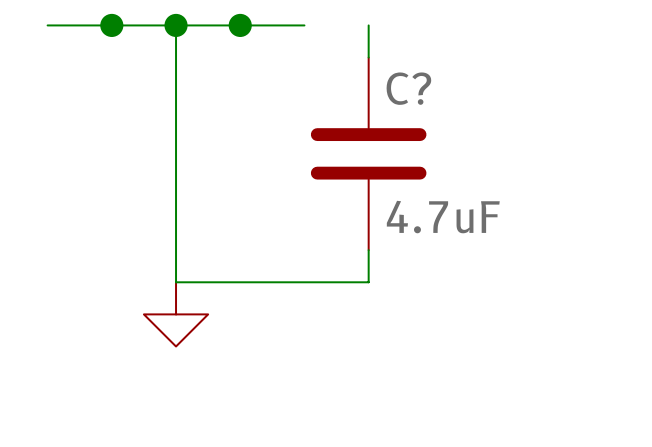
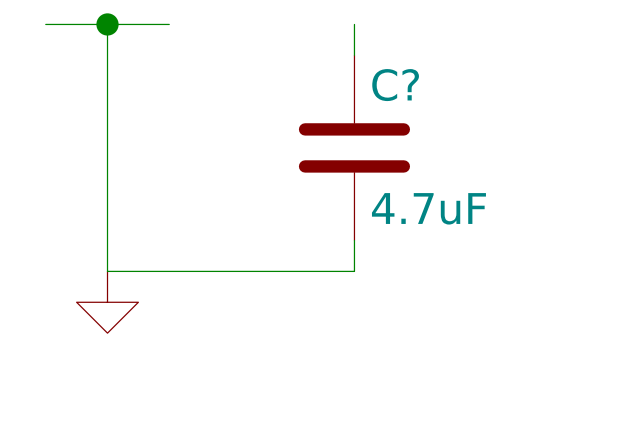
junction: (176, 25) -> none
junction: (240, 25) -> none
wire: (304, 25) (176, 25) (176, 282) -> (107, 24) (107, 271) (169, 271)
power symbol position: (176, 314) -> (107, 302)

